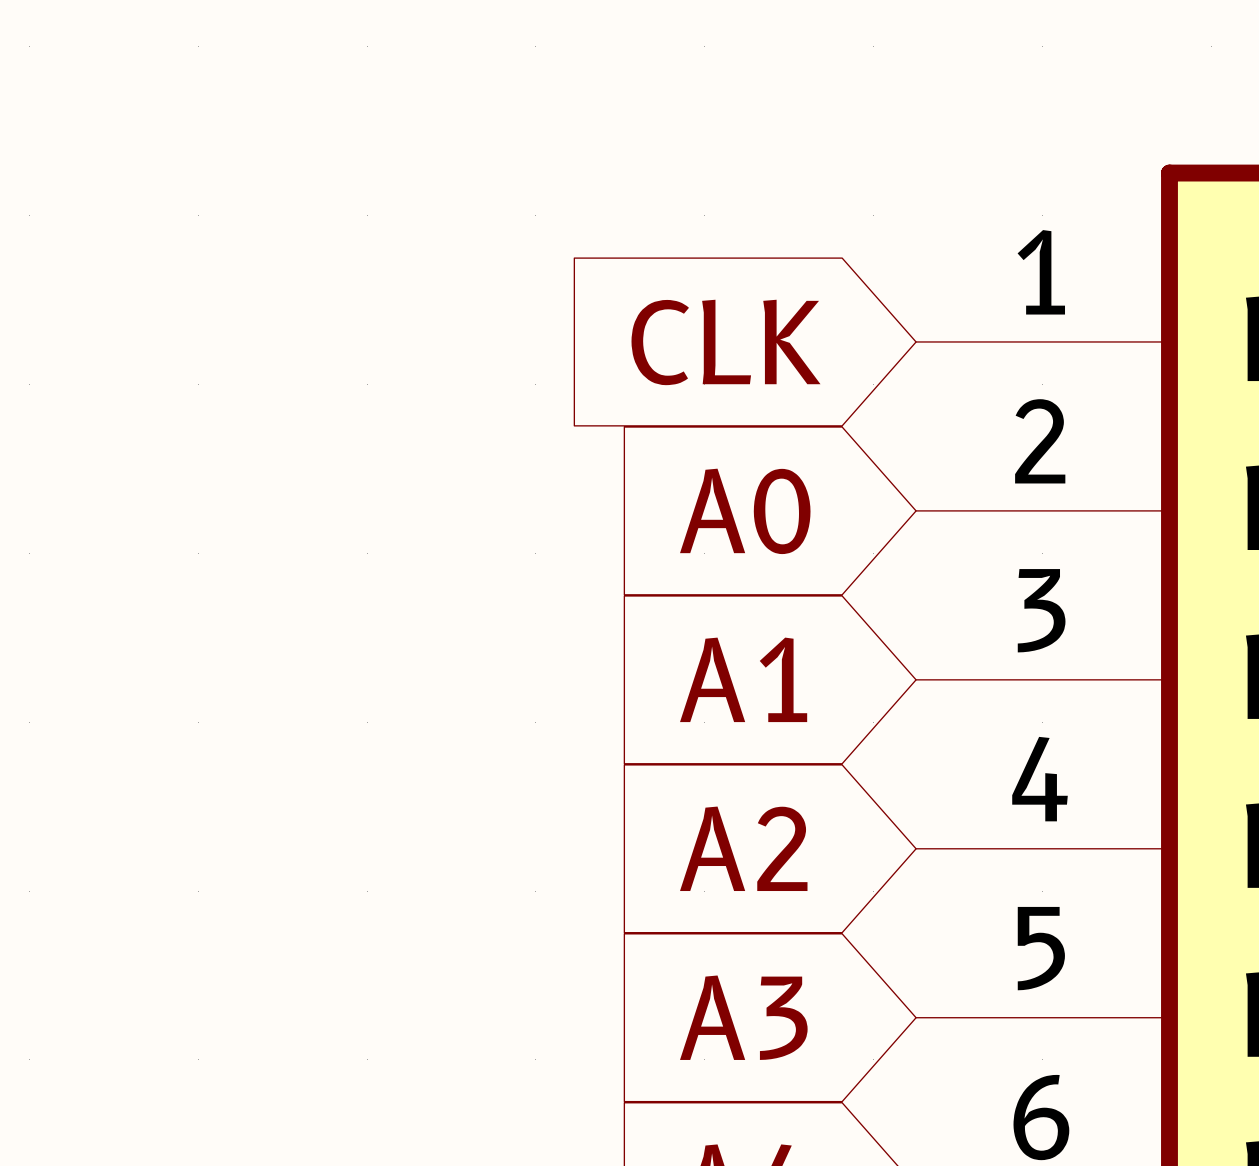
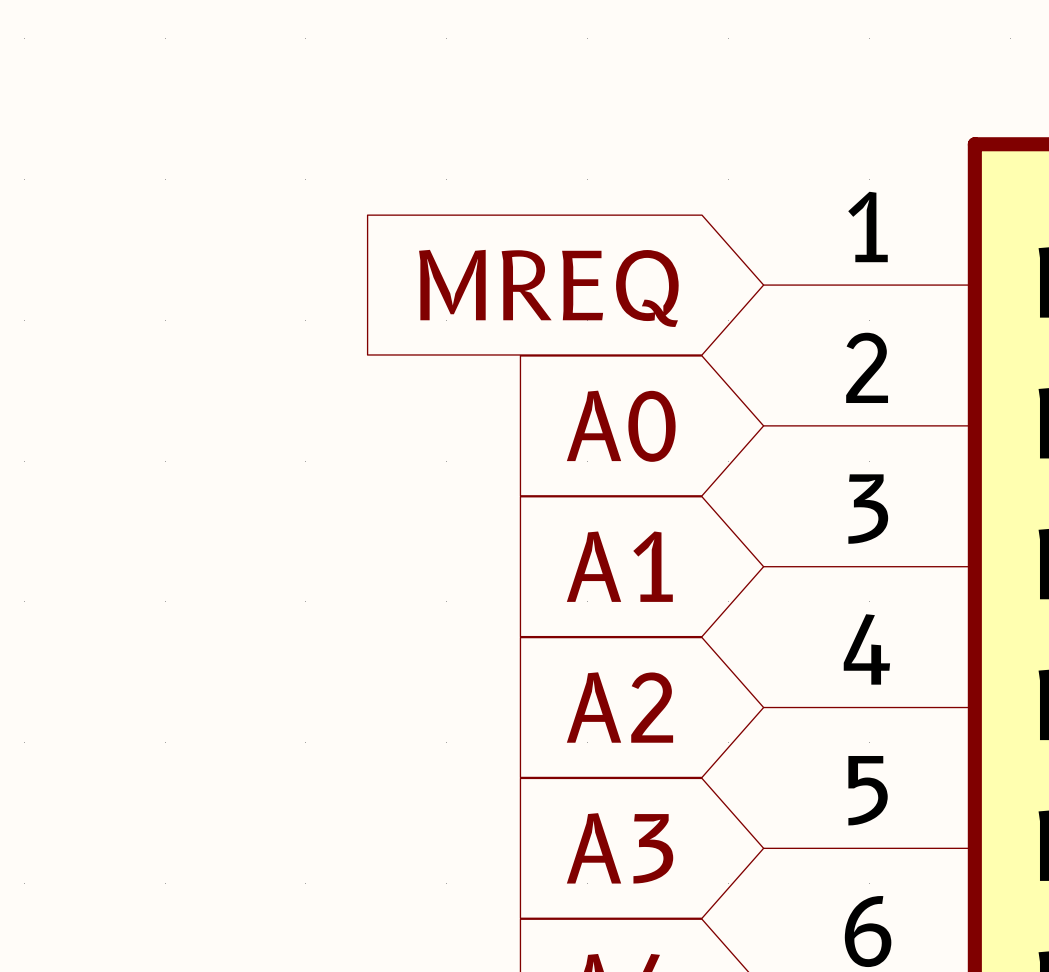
global label: CLK (726, 342) -> MREQ (548, 288)

